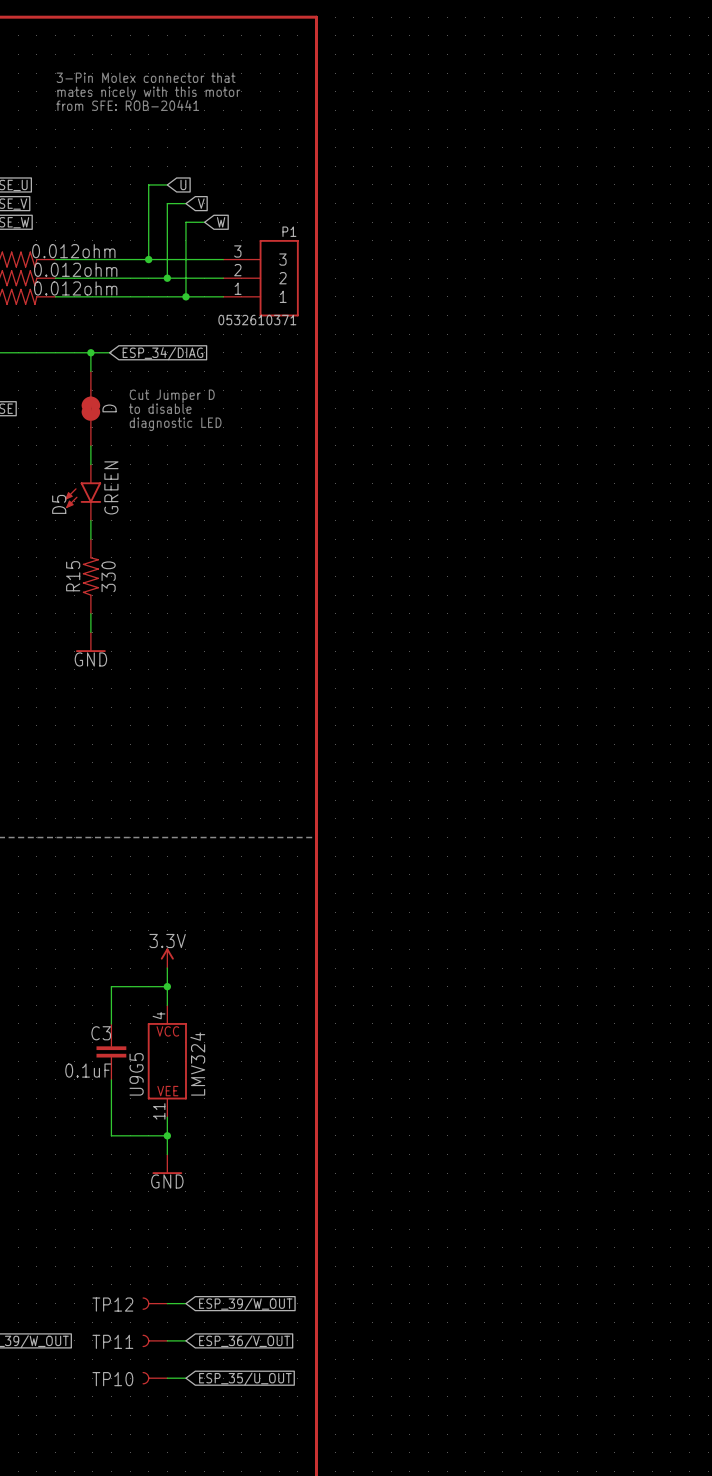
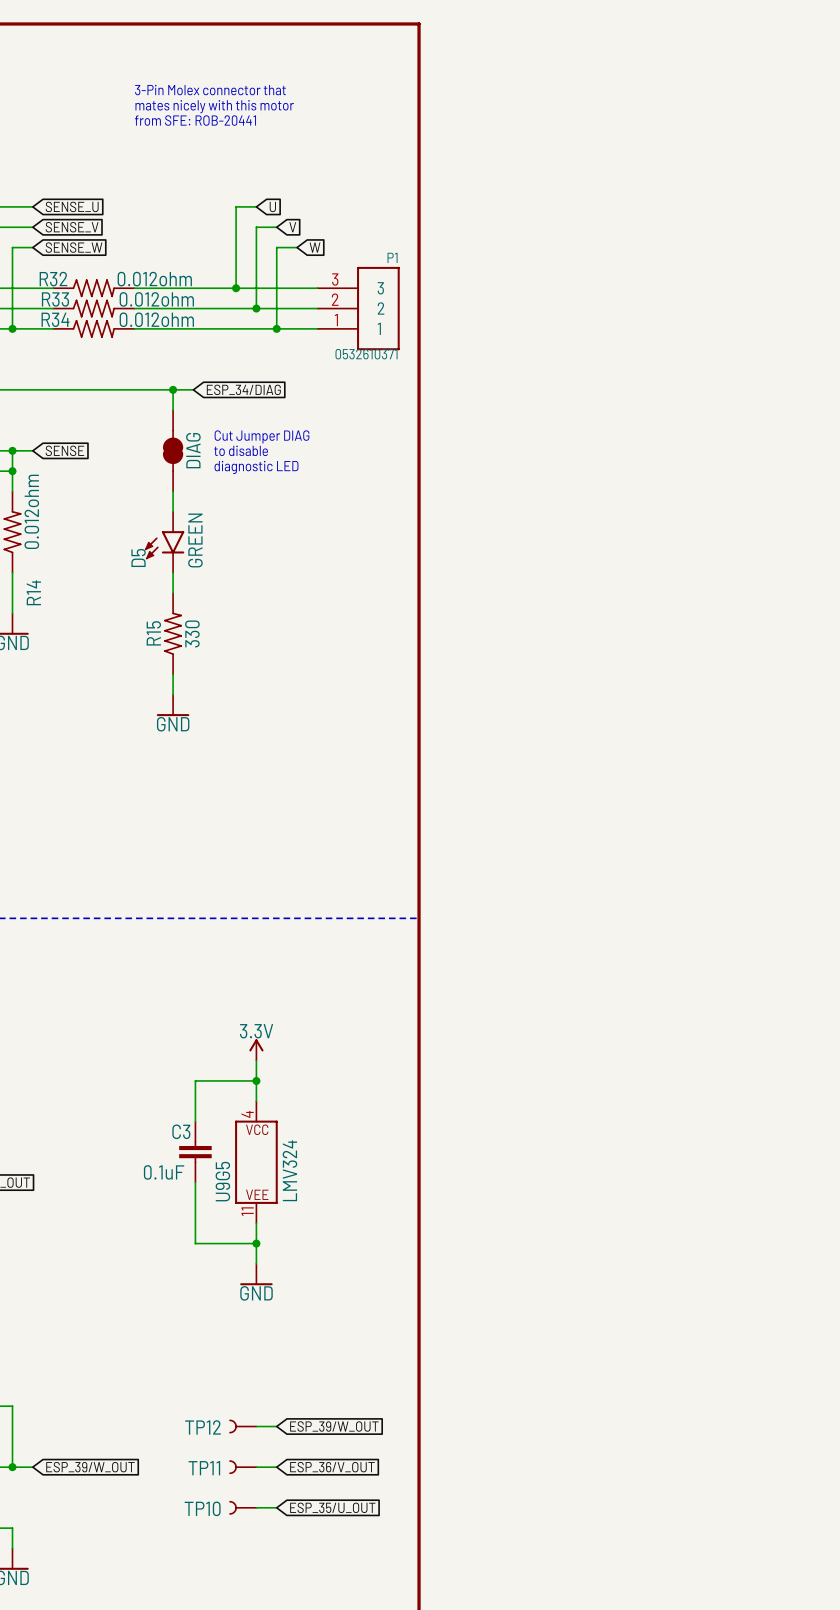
text: Cut Jumper D (172, 396) -> Cut Jumper DIAG (262, 436)
D name: D (109, 408) -> DIAG (193, 450)

